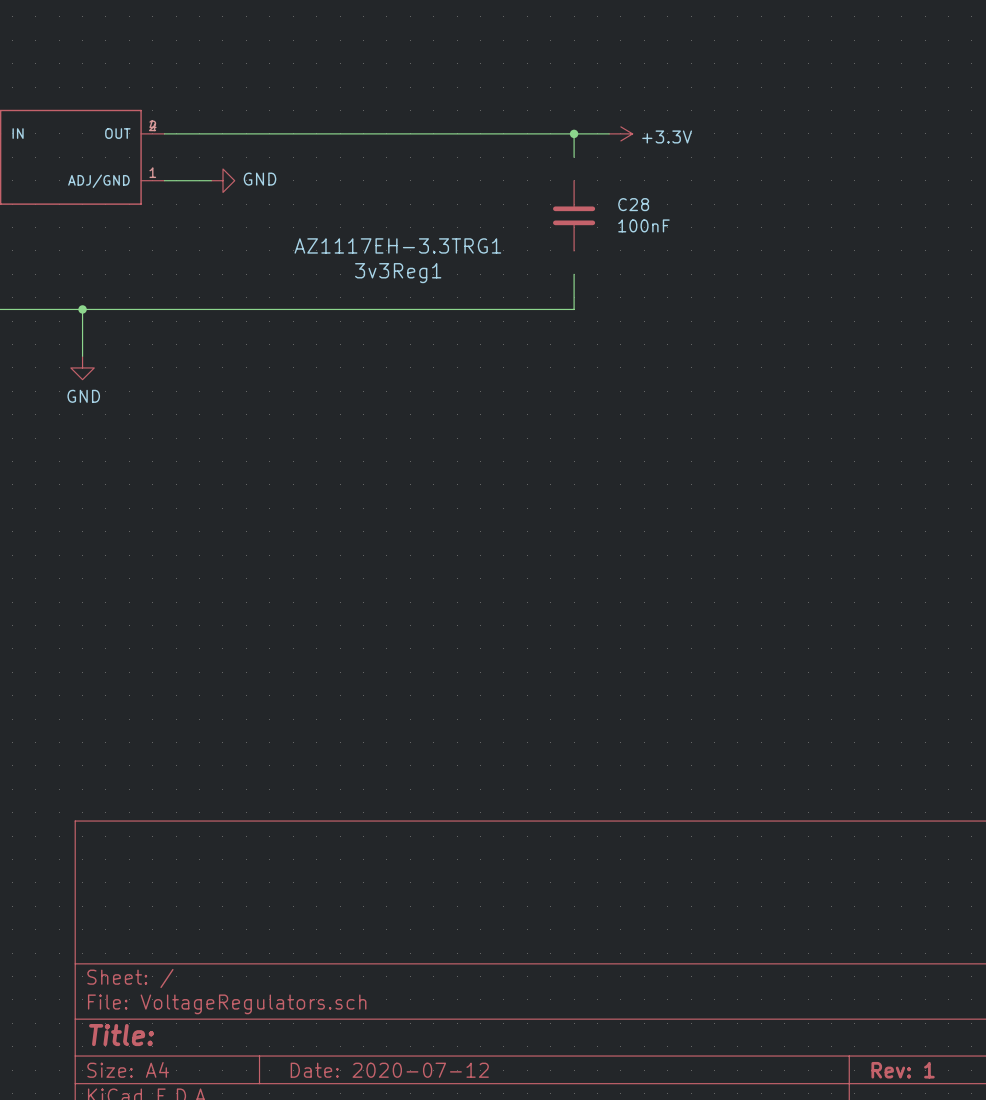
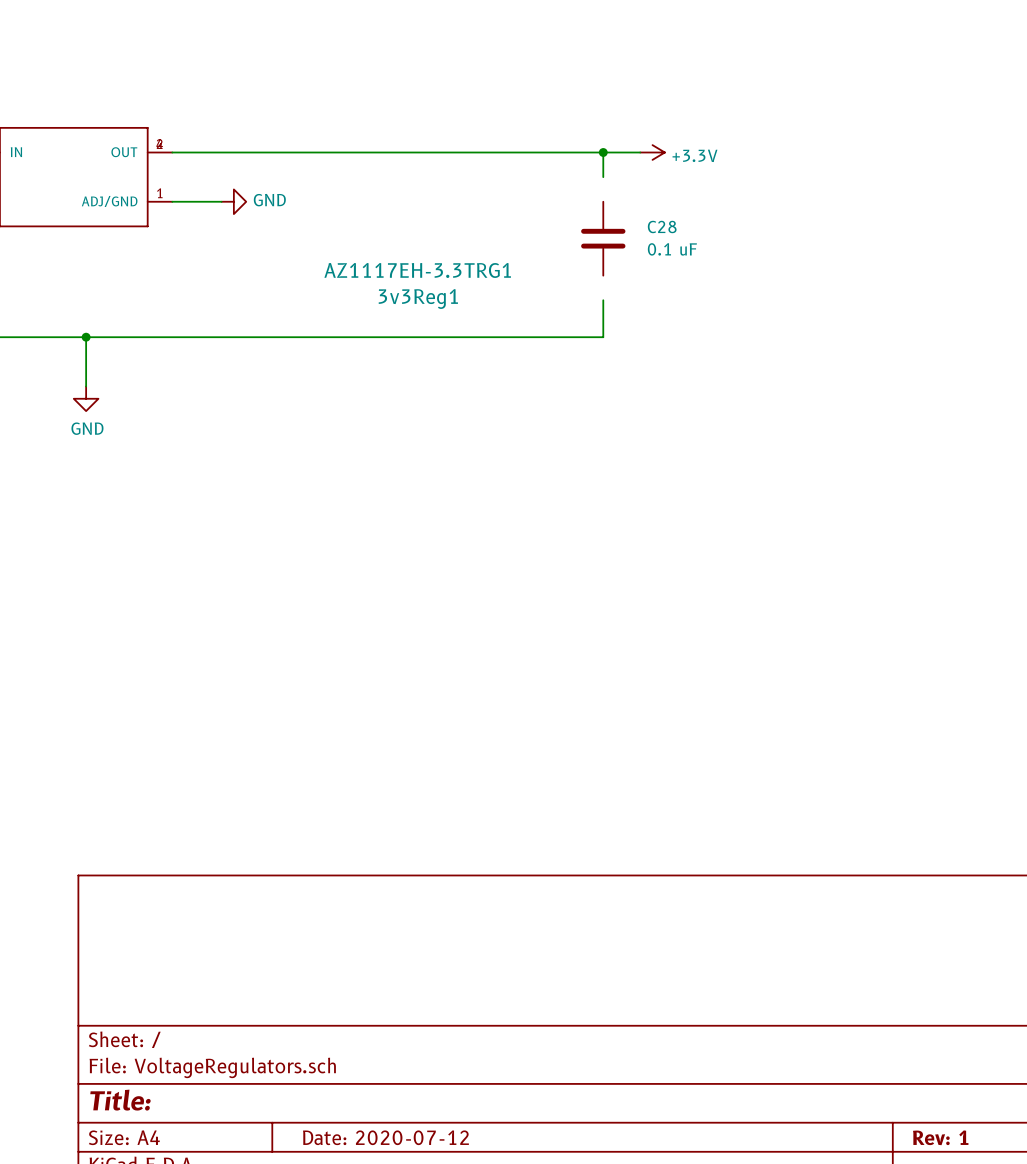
C28 value: 100nF (643, 225) -> 0.1 uF (672, 249)

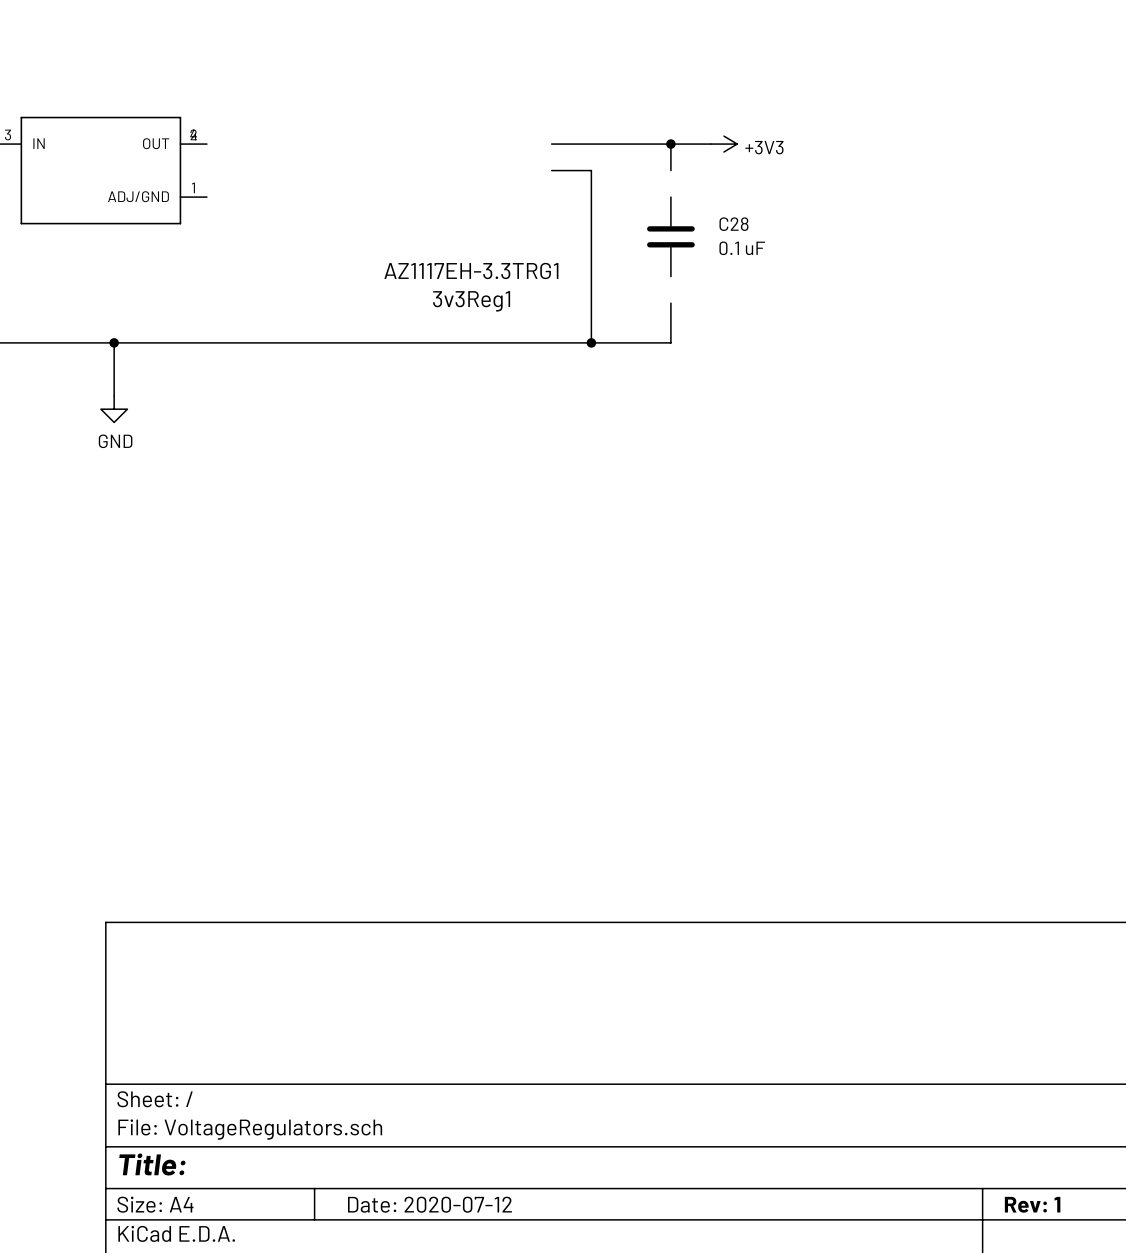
wire: (172, 152) (492, 152) -> none
power symbol: +3.3V (652, 152) -> +3V3 (723, 144)
wire: none -> (551, 170) (591, 170) (591, 342)
wire: (172, 201) (221, 201) -> none
power symbol: GND (233, 201) -> none
junction: none -> (591, 342)

